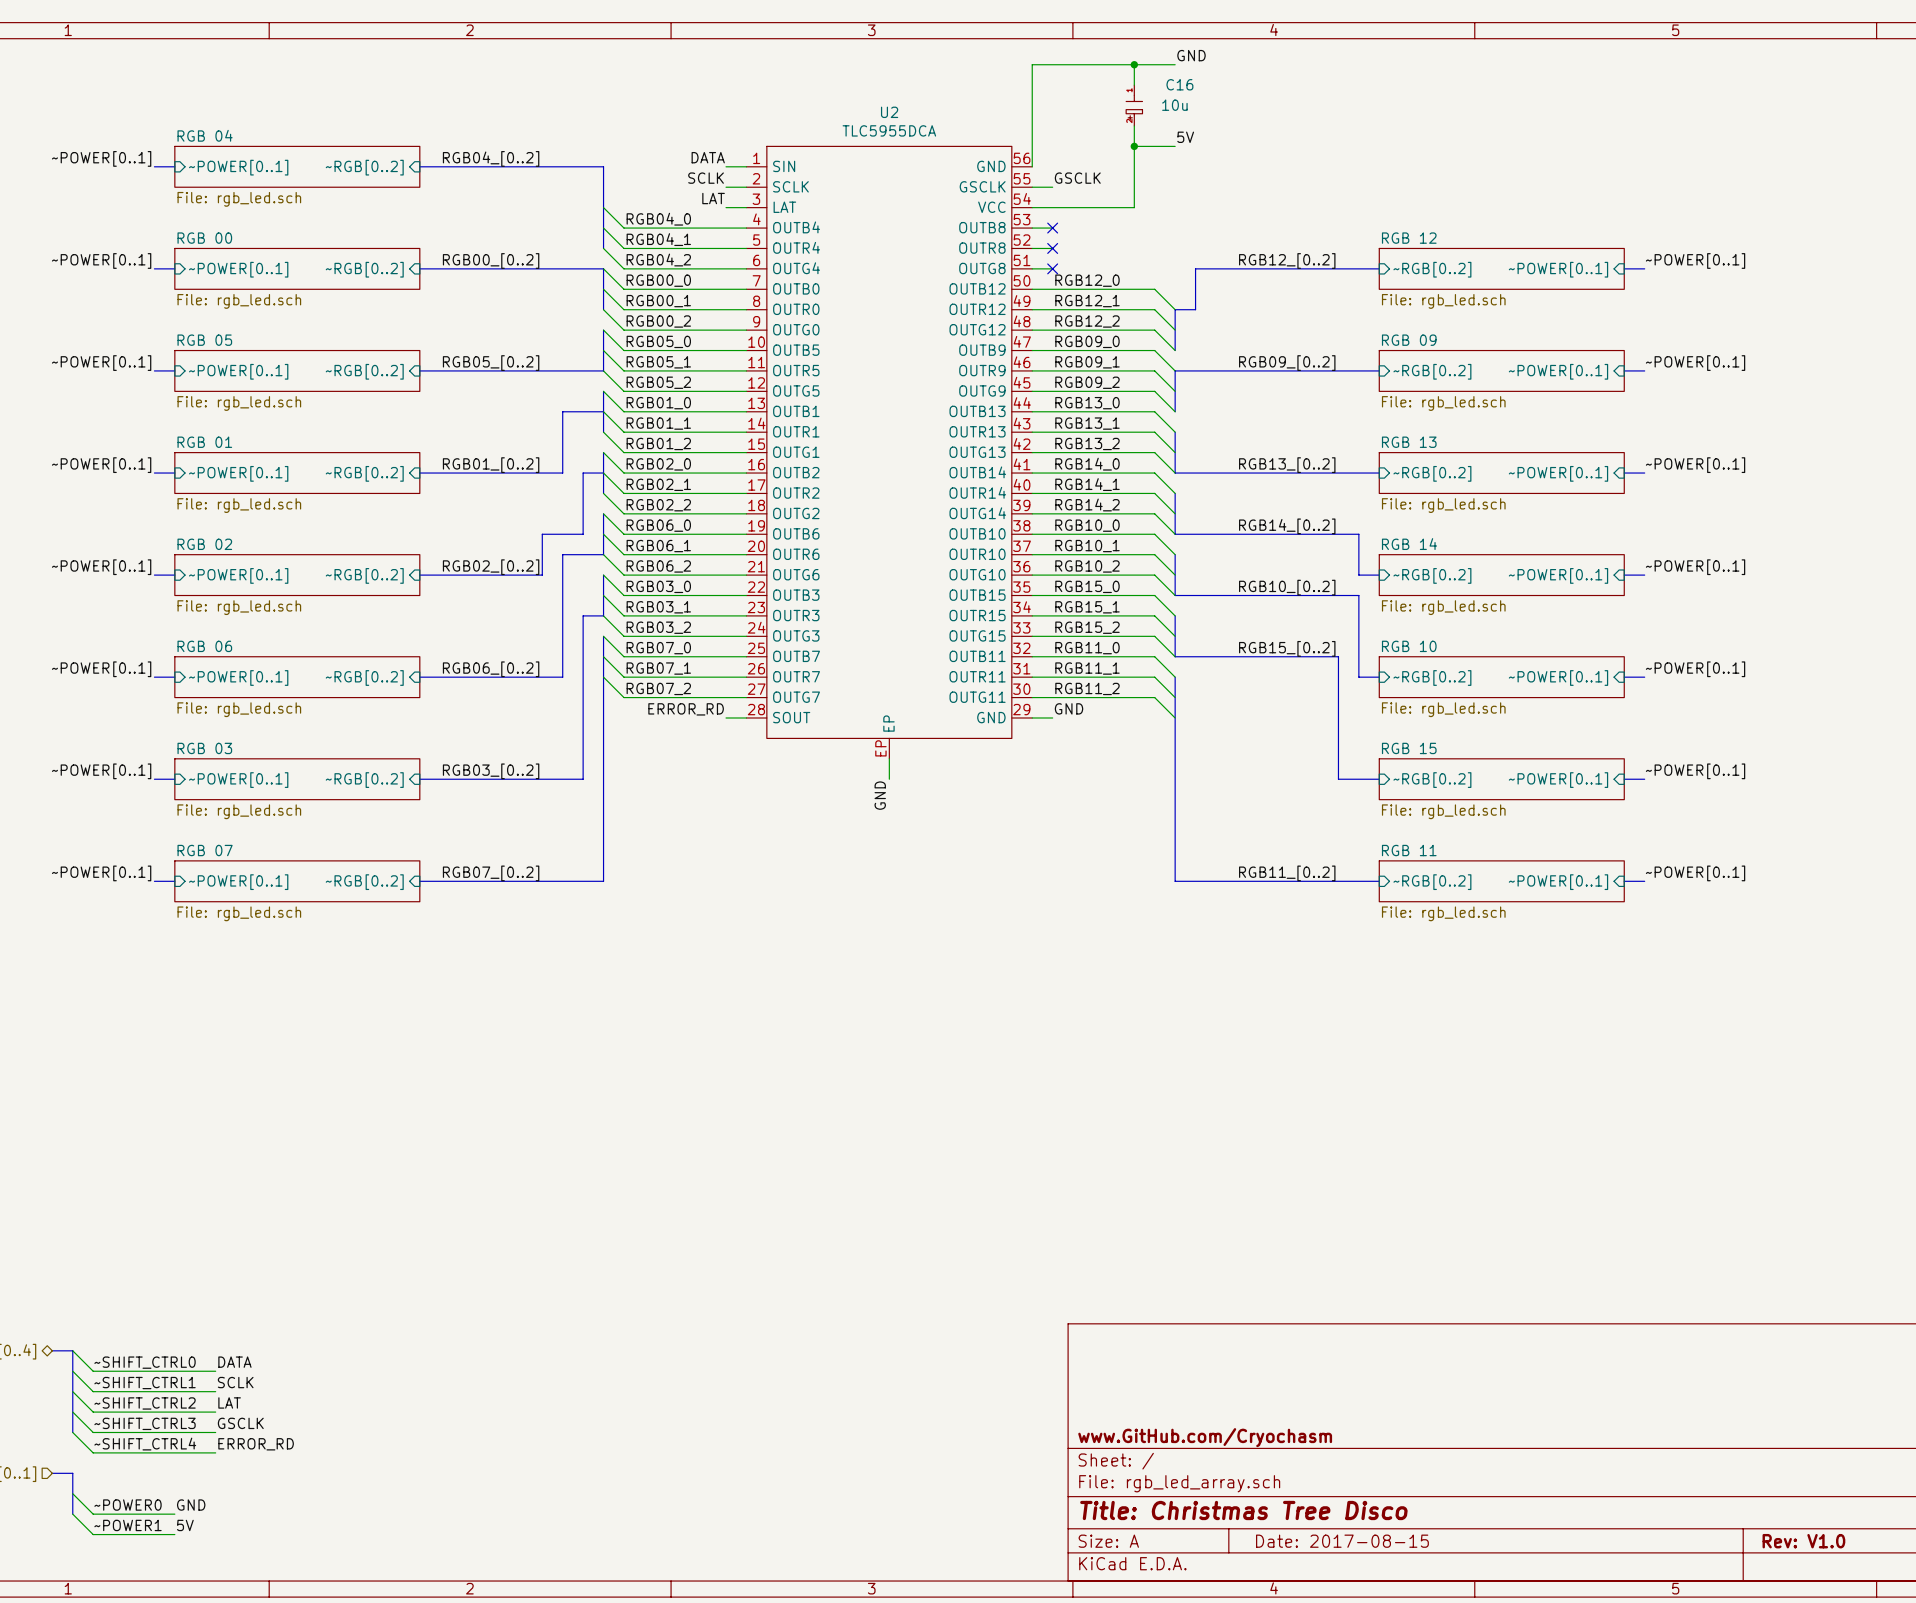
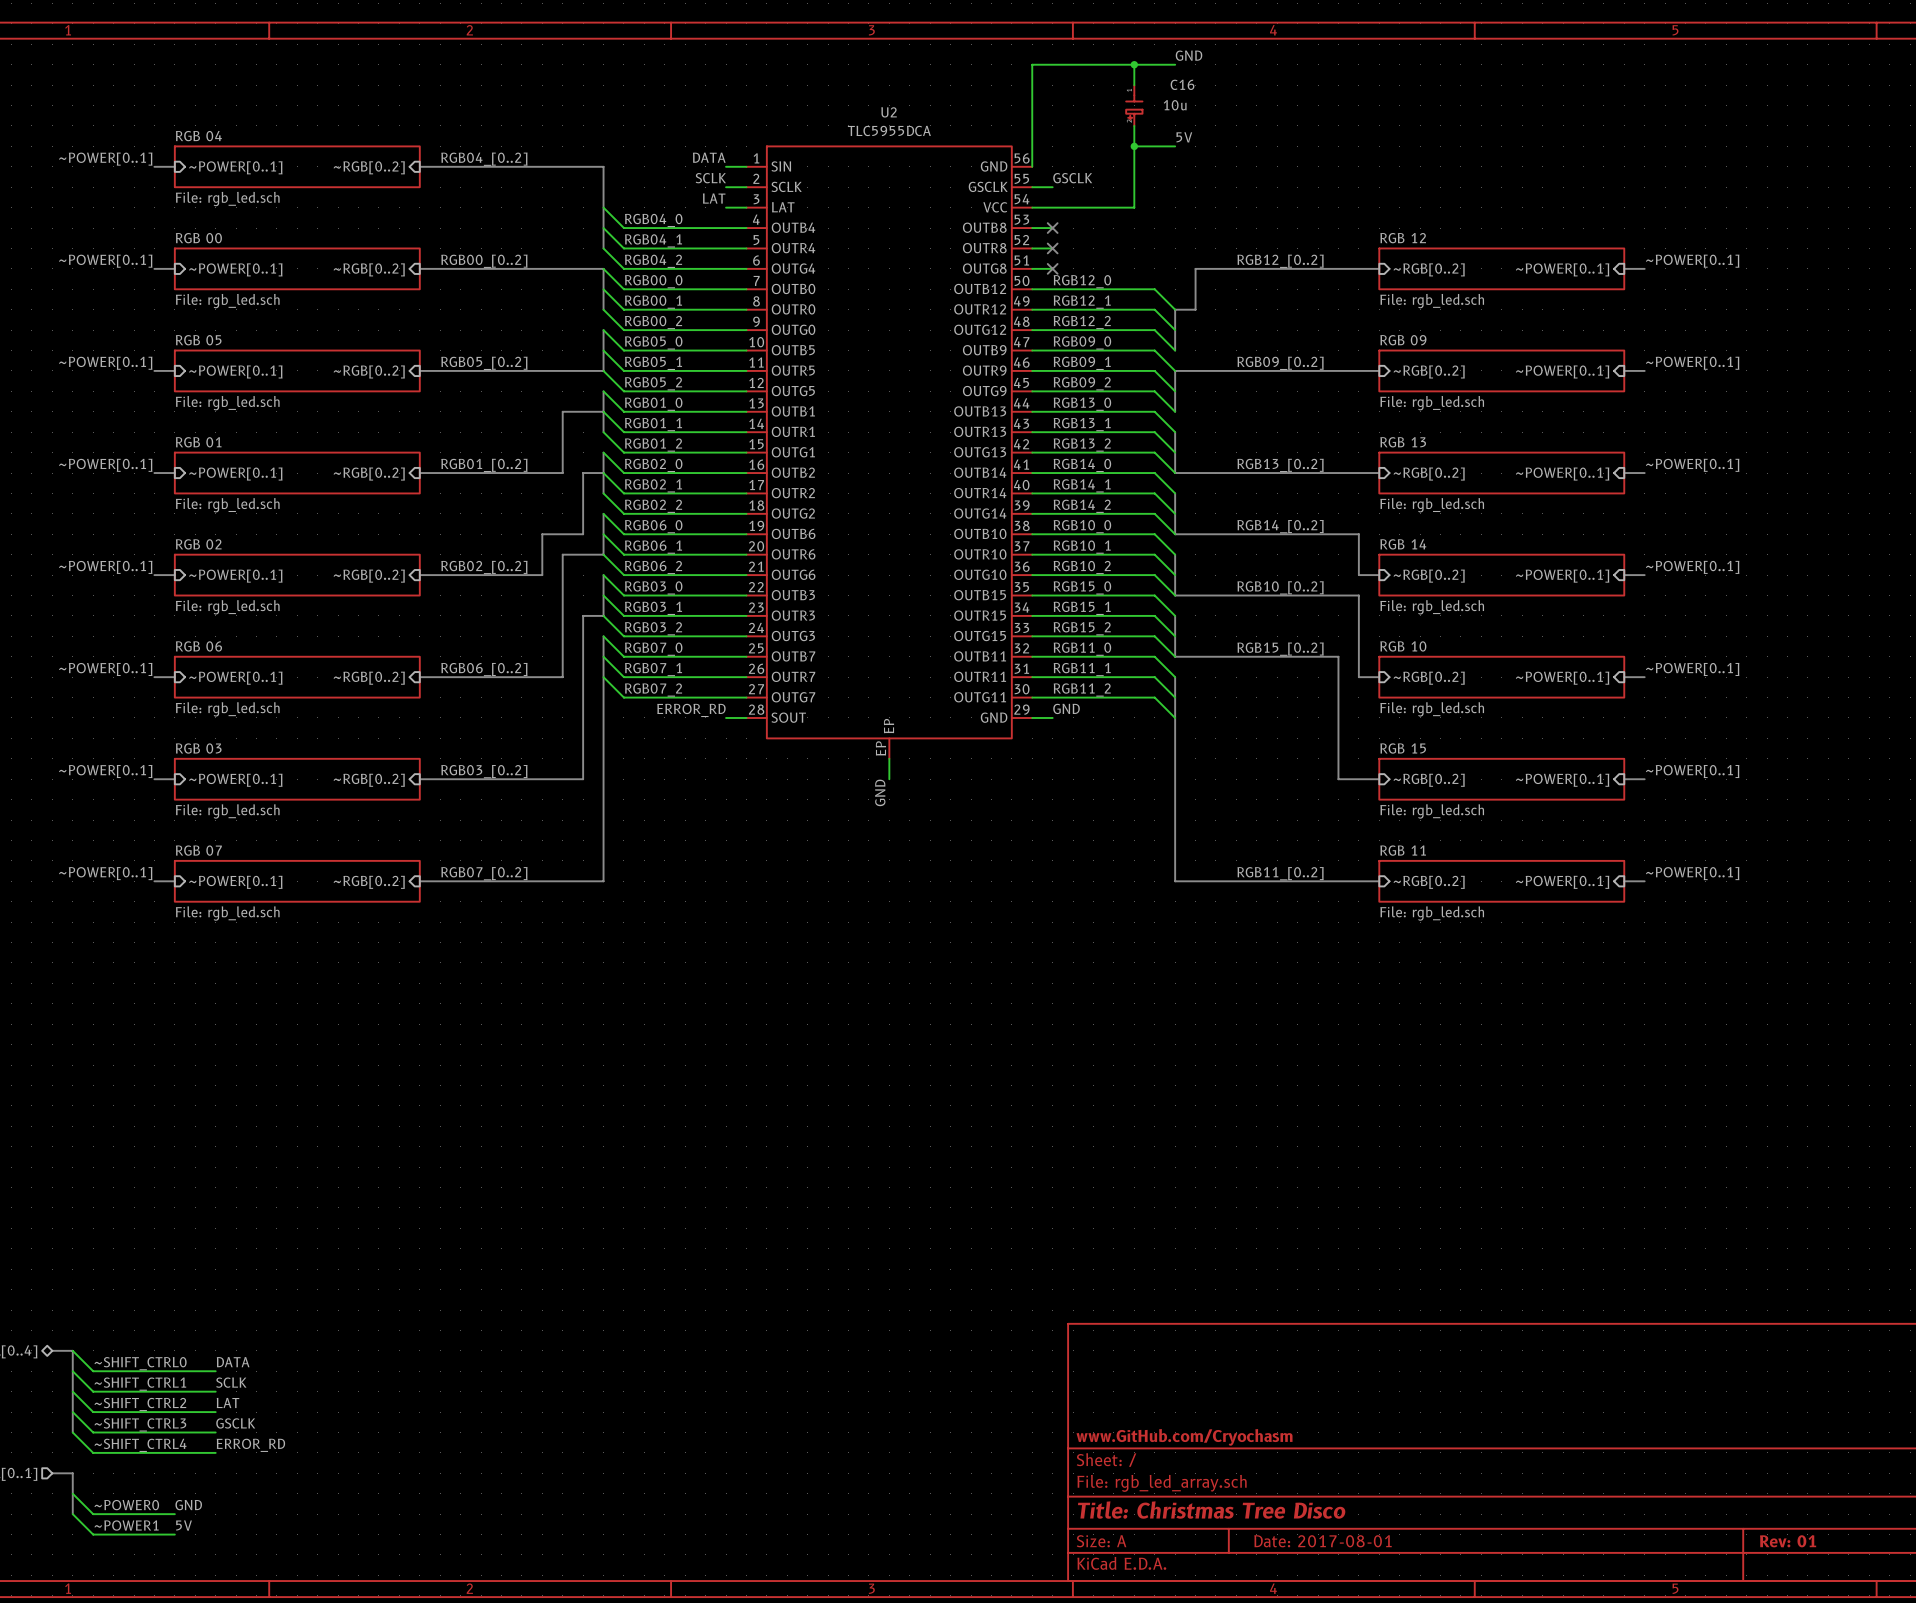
title block: Date: 2017-08-15 (1342, 1541) -> Date: 2017-08-01 (1323, 1541)
title block: Rev: V1.0 (1803, 1541) -> Rev: 01 (1788, 1541)

